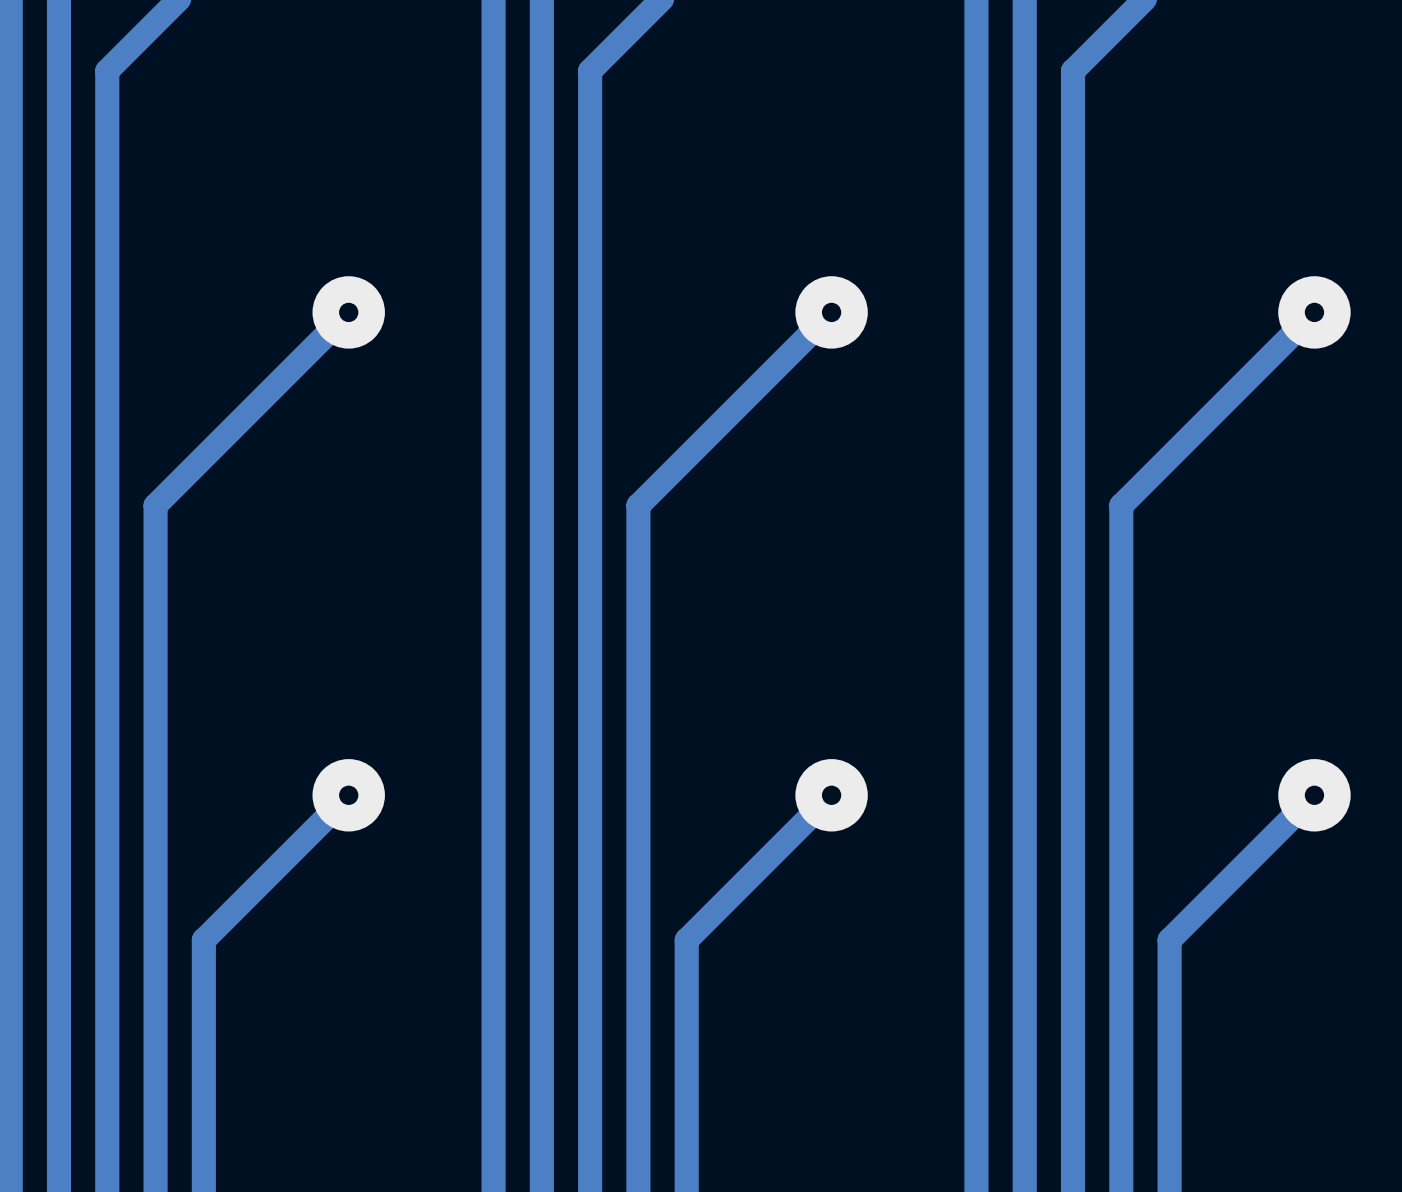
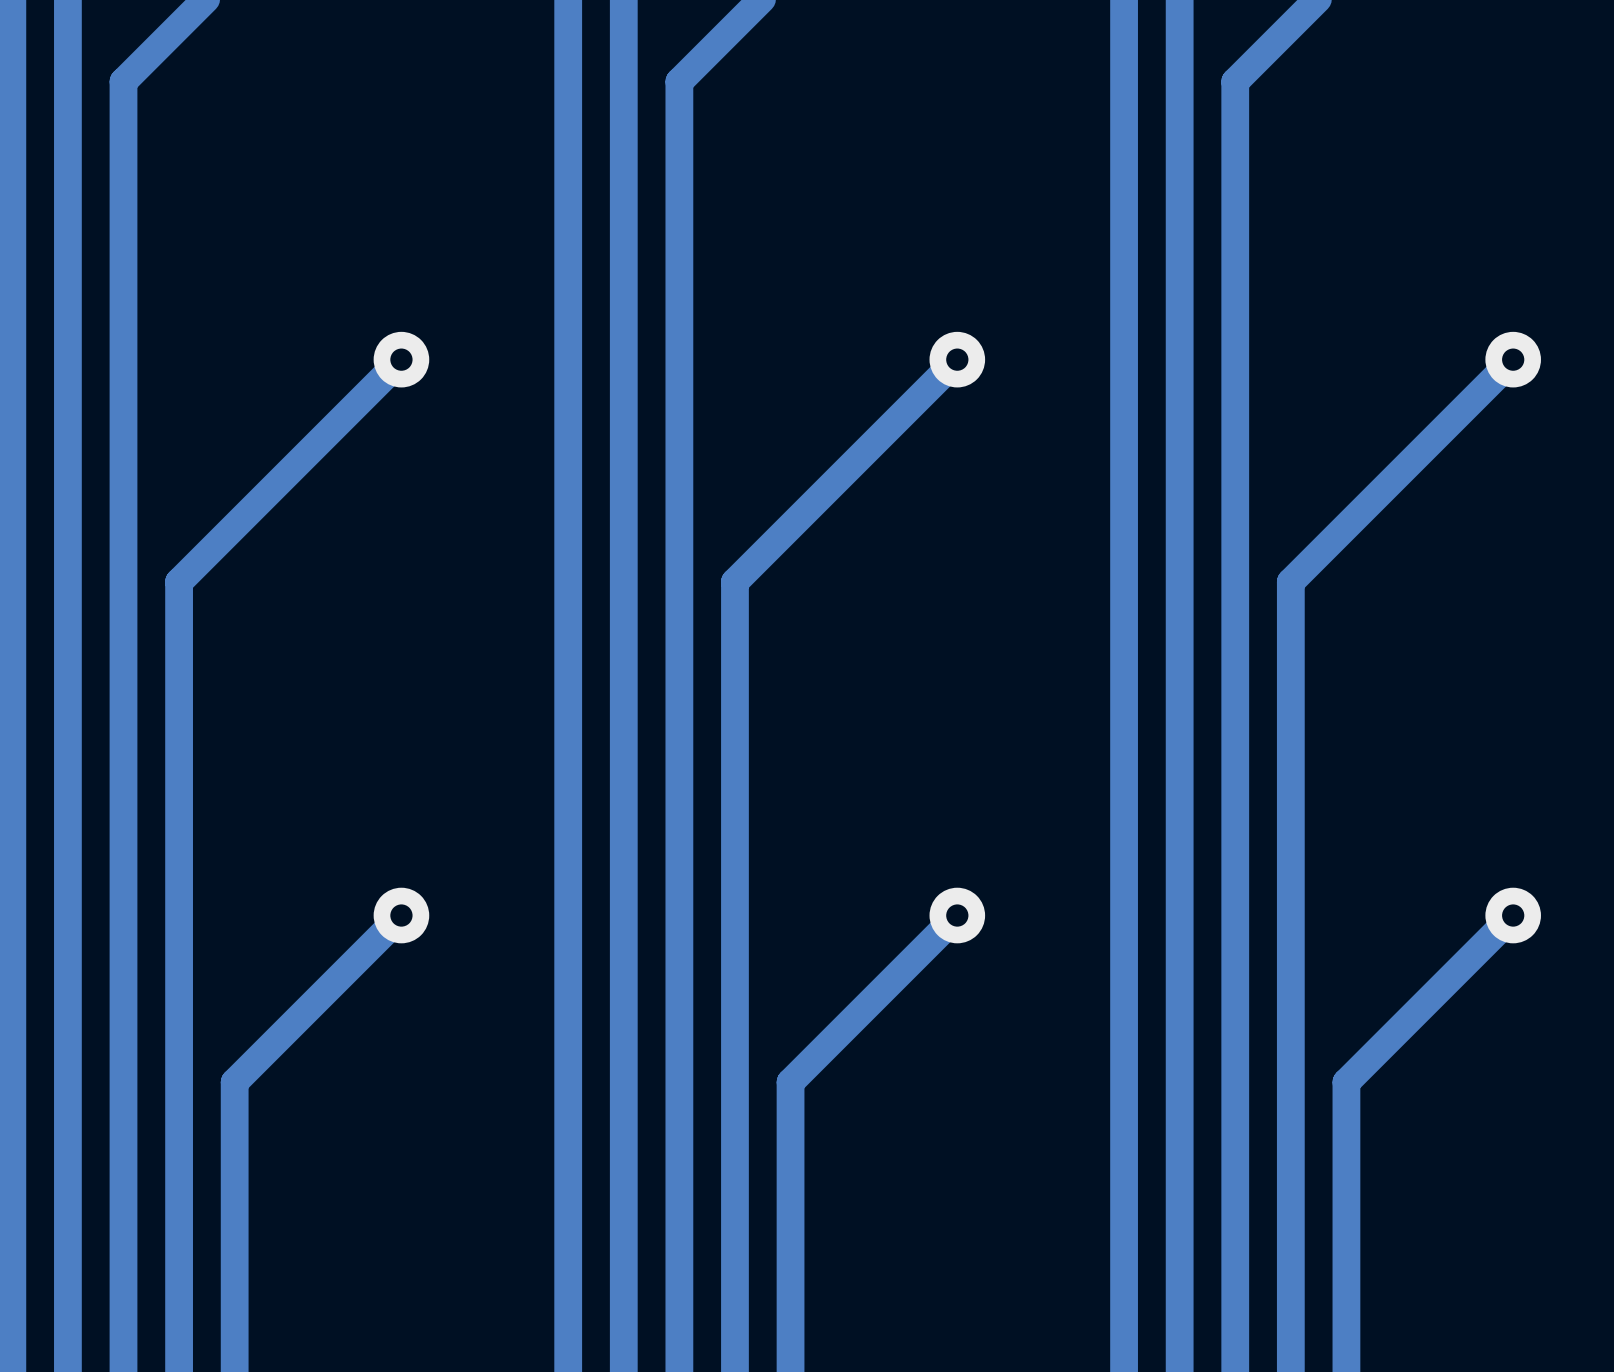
via size: [312, 276, 385, 349] -> [373, 331, 430, 388]
via size: [795, 276, 868, 349] -> [929, 331, 986, 388]
via size: [1278, 276, 1351, 349] -> [1485, 331, 1541, 388]
via size: [312, 759, 385, 832] -> [373, 887, 430, 944]
via size: [795, 759, 868, 832] -> [929, 887, 986, 944]
via size: [1278, 759, 1351, 832] -> [1485, 887, 1541, 944]

